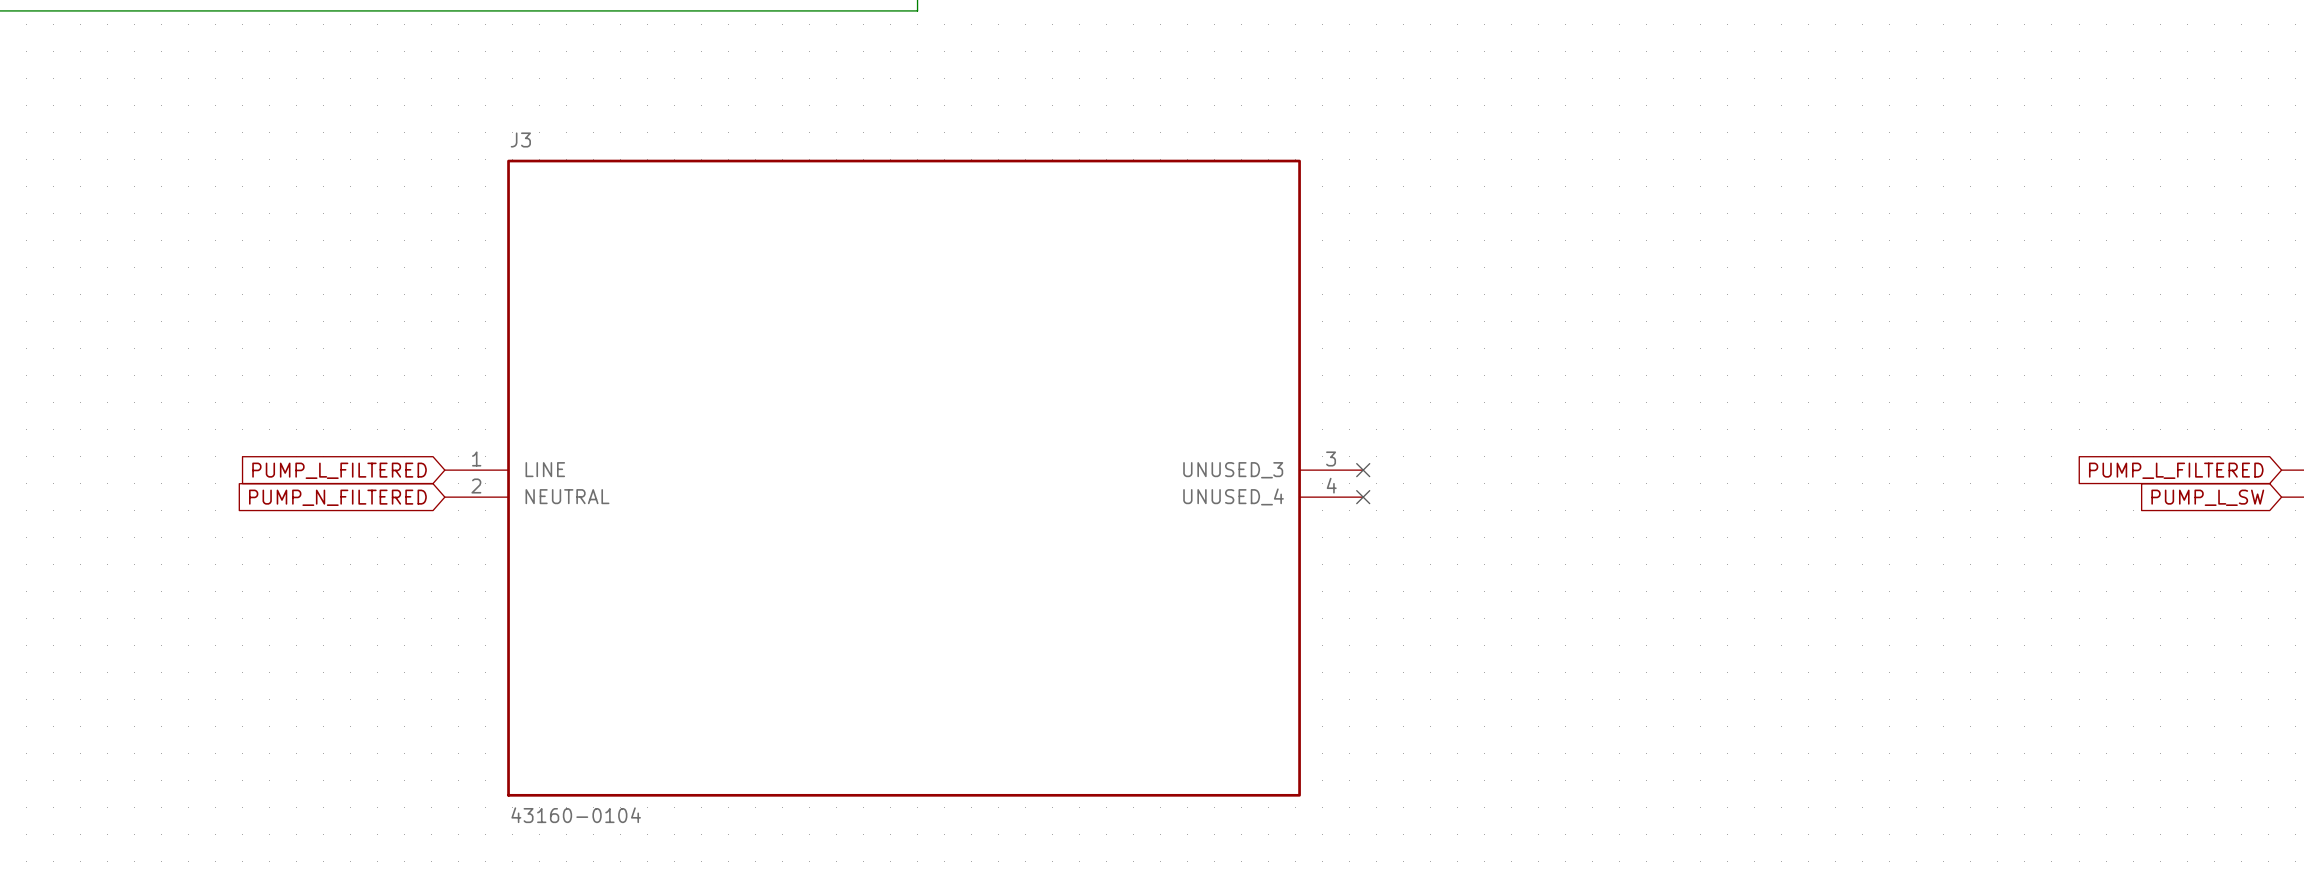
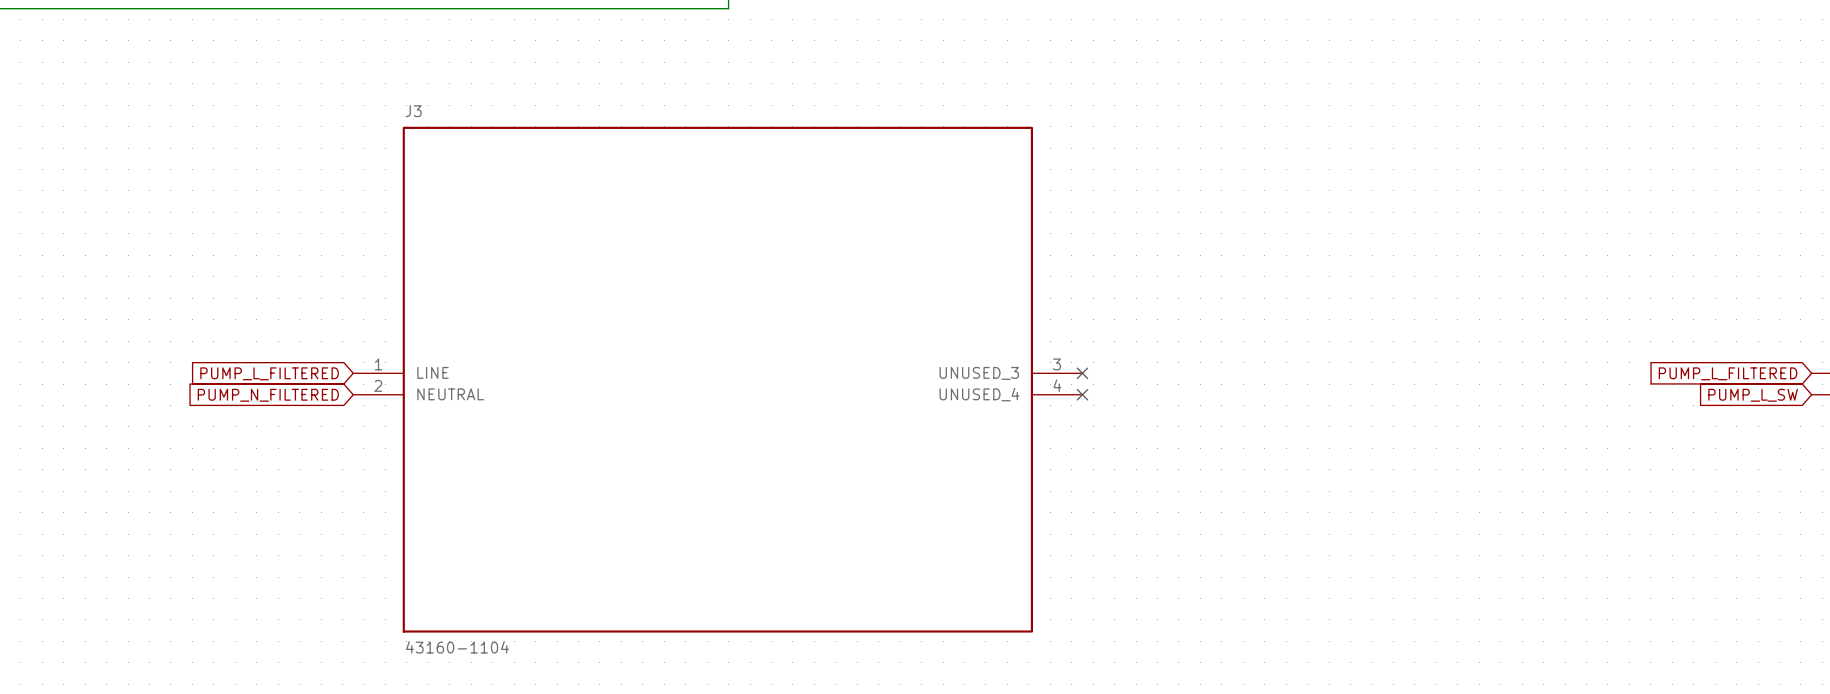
J3 value: 43160-0104 (576, 815) -> 43160-1104 (457, 647)

